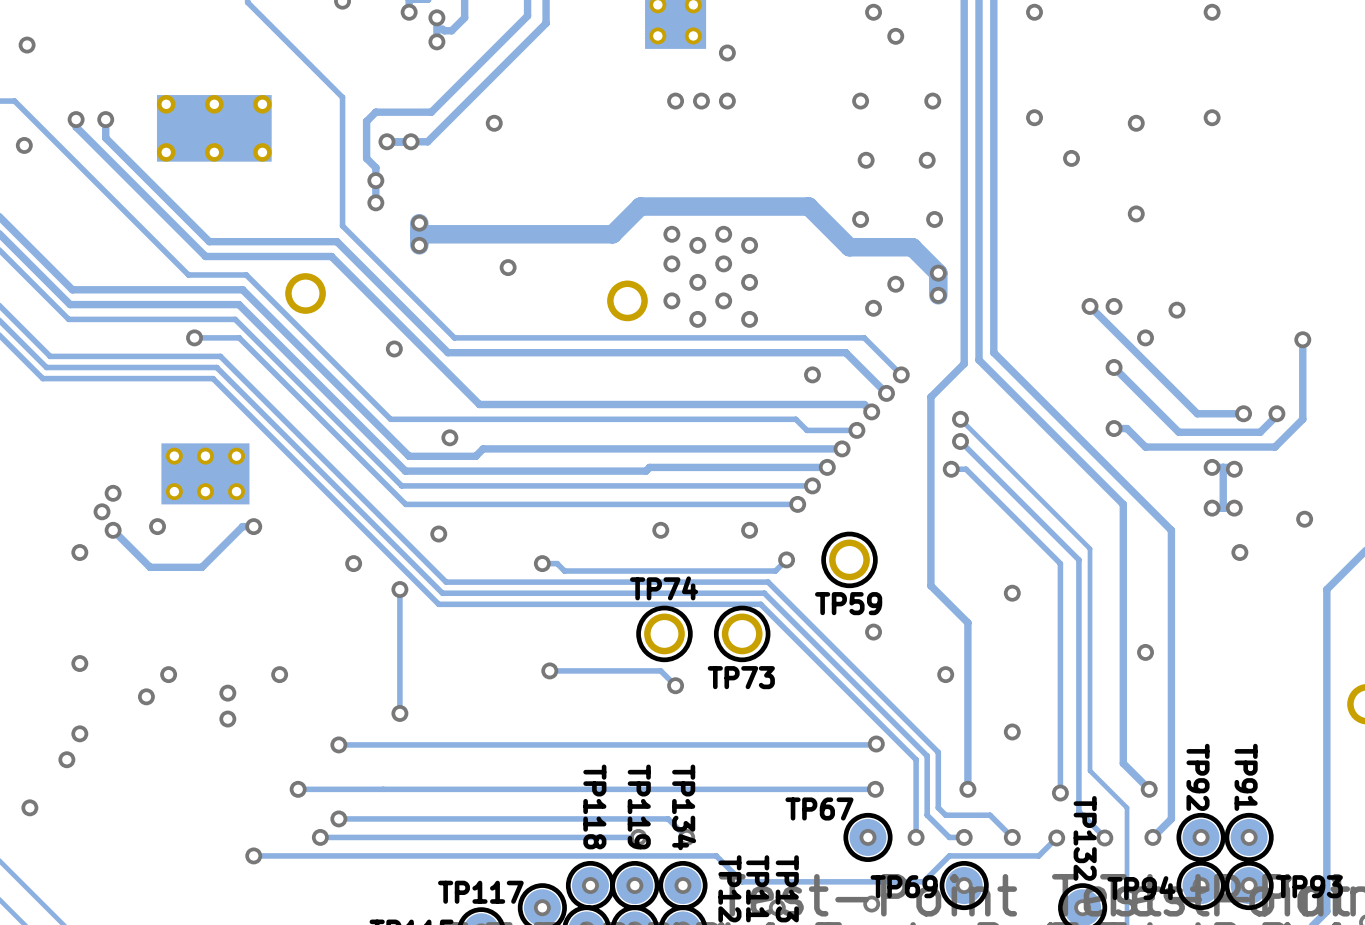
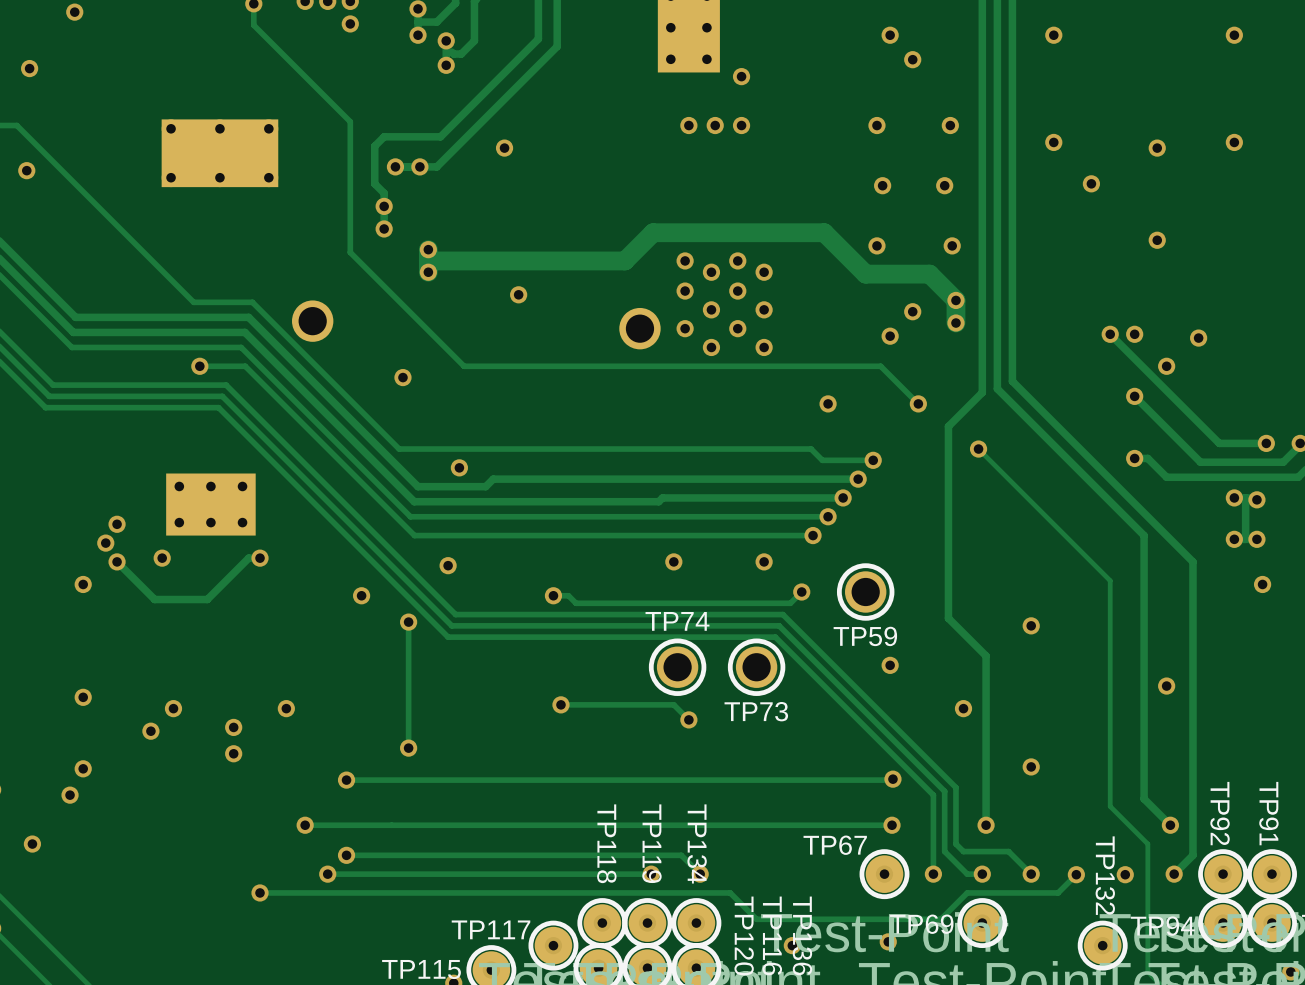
track: (76, 119) (76, 126) (205, 256) (331, 256) (479, 404) (864, 404) (871, 411) -> none
via: (76, 119) -> none
track: (105, 119) (105, 138) (209, 241) (336, 241) (448, 352) (845, 352) (886, 393) -> none
via: (105, 119) -> none
via: (886, 393) -> none
via: (871, 411) -> none
track: (960, 441) (1078, 559) (1078, 811) (1104, 837) -> none
via: (960, 441) -> none
track: (951, 469) (966, 469) (1060, 563) (1060, 793) -> none
via: (951, 469) -> none
via: (1060, 793) -> none

